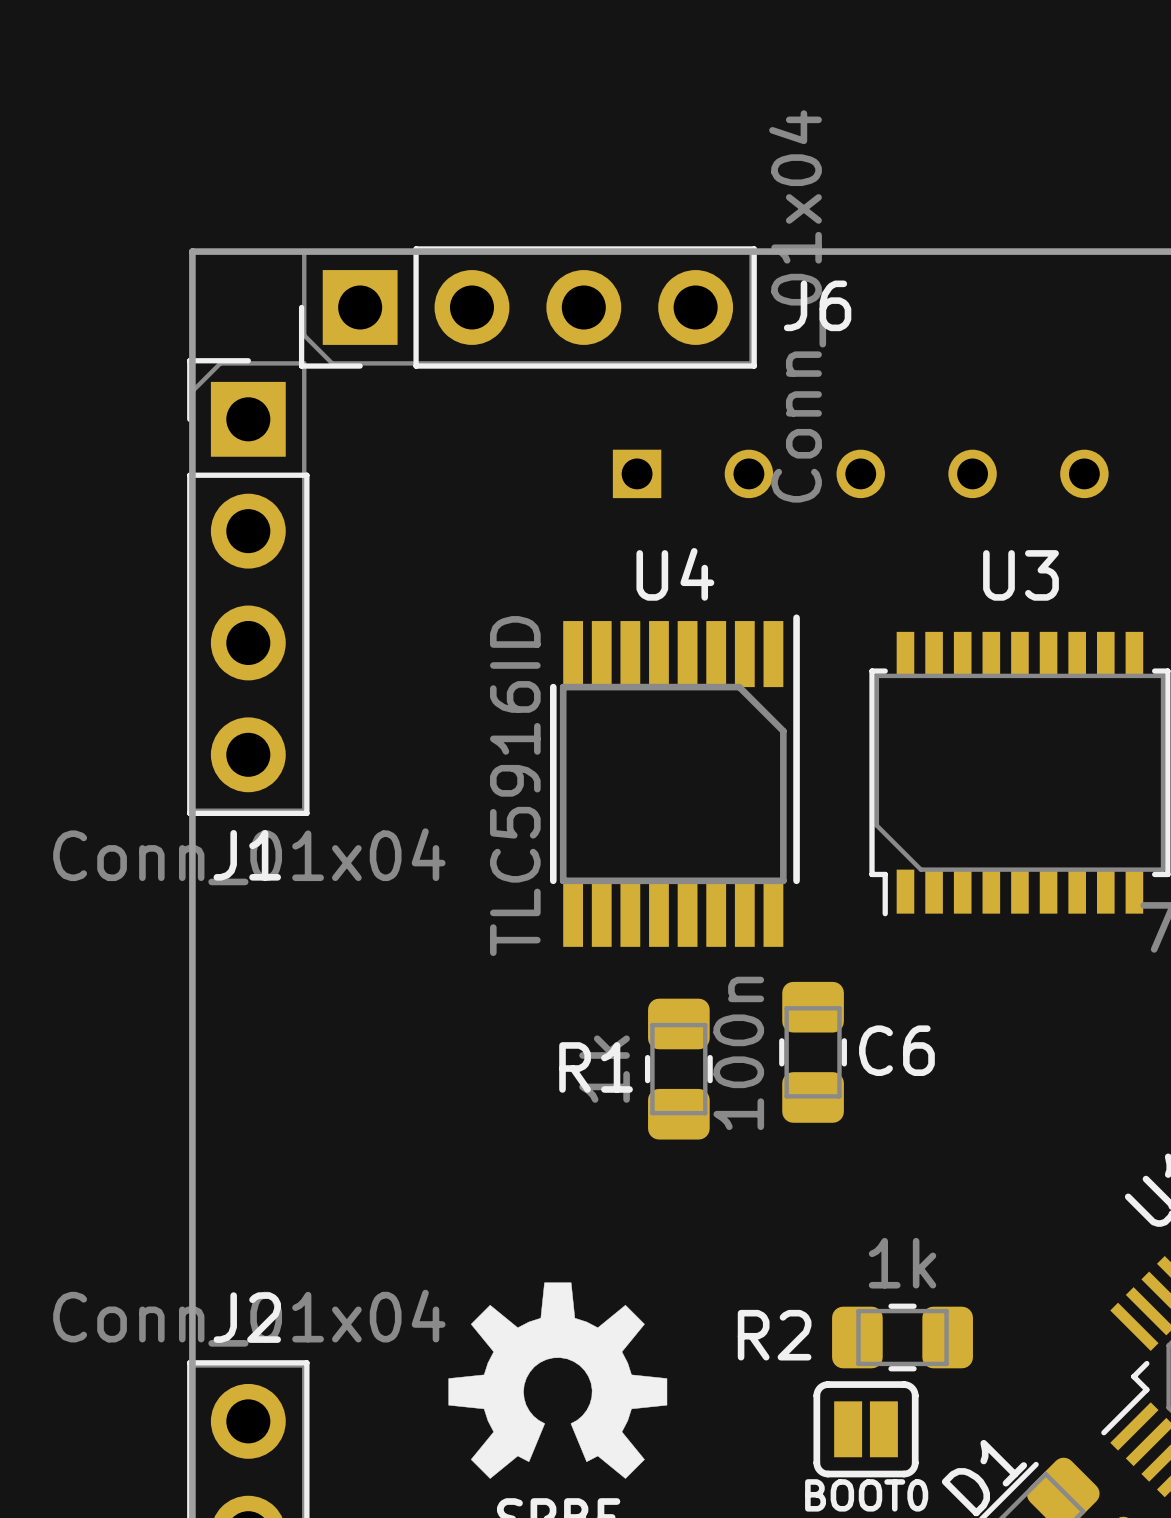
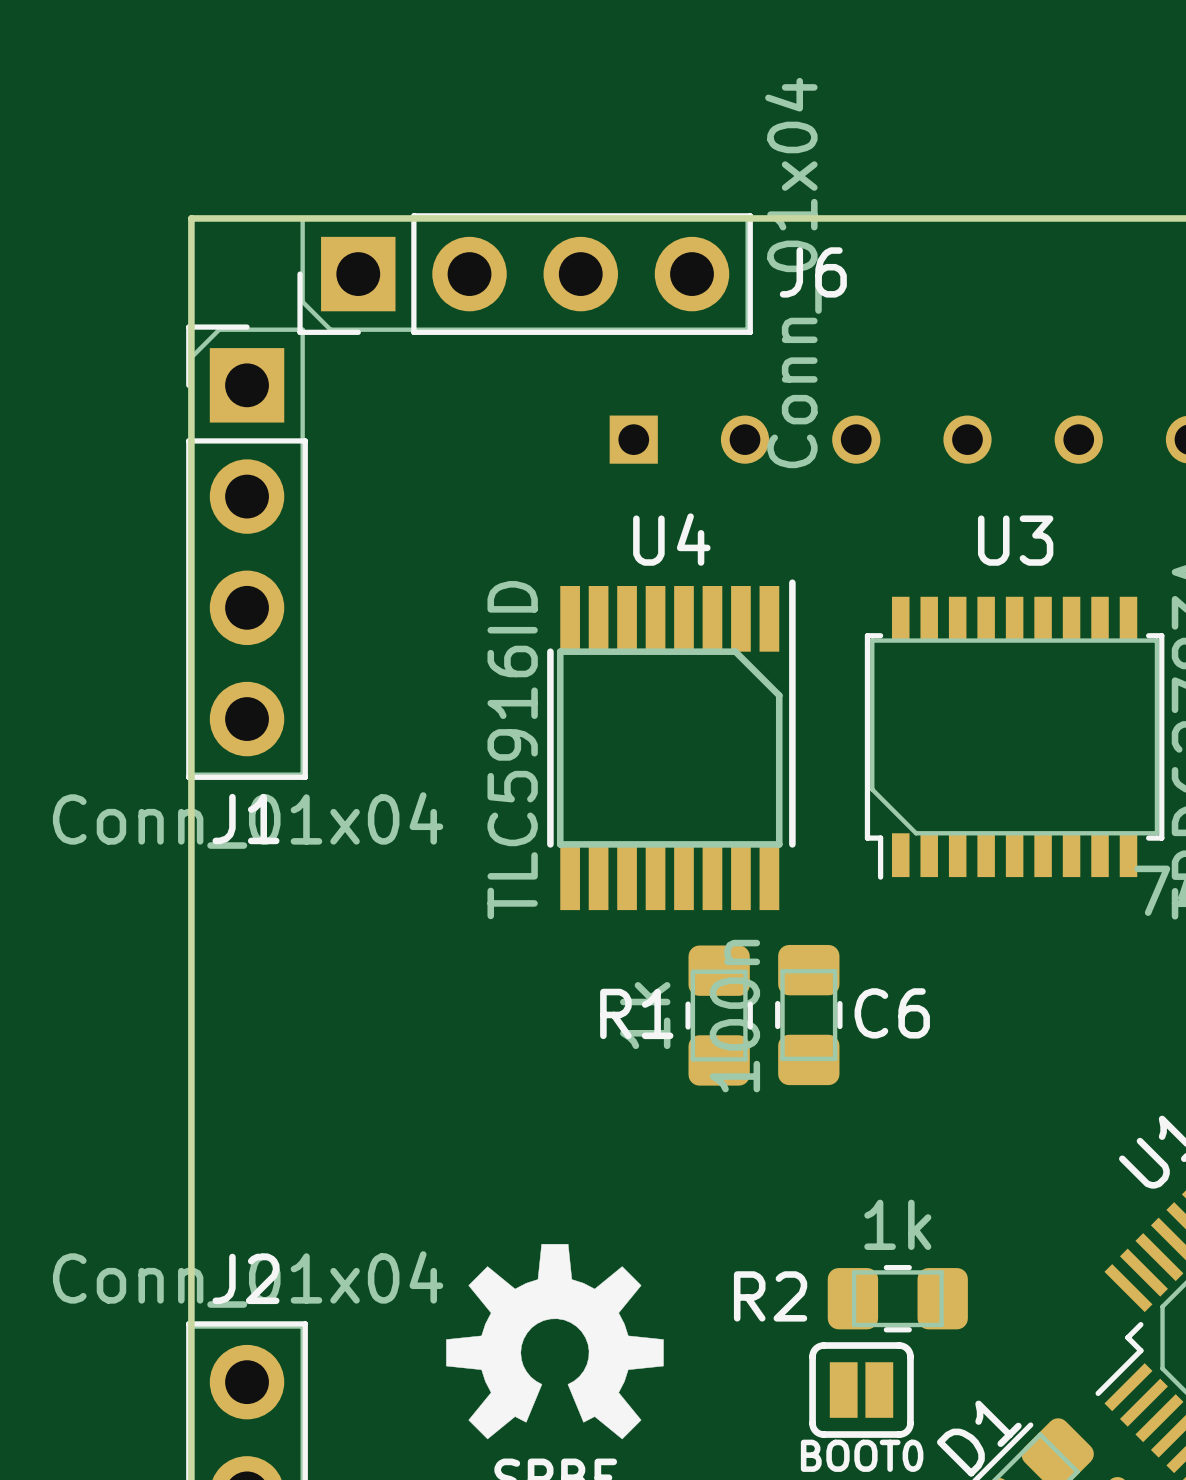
R1 position: (678, 1069) -> (719, 1015)

